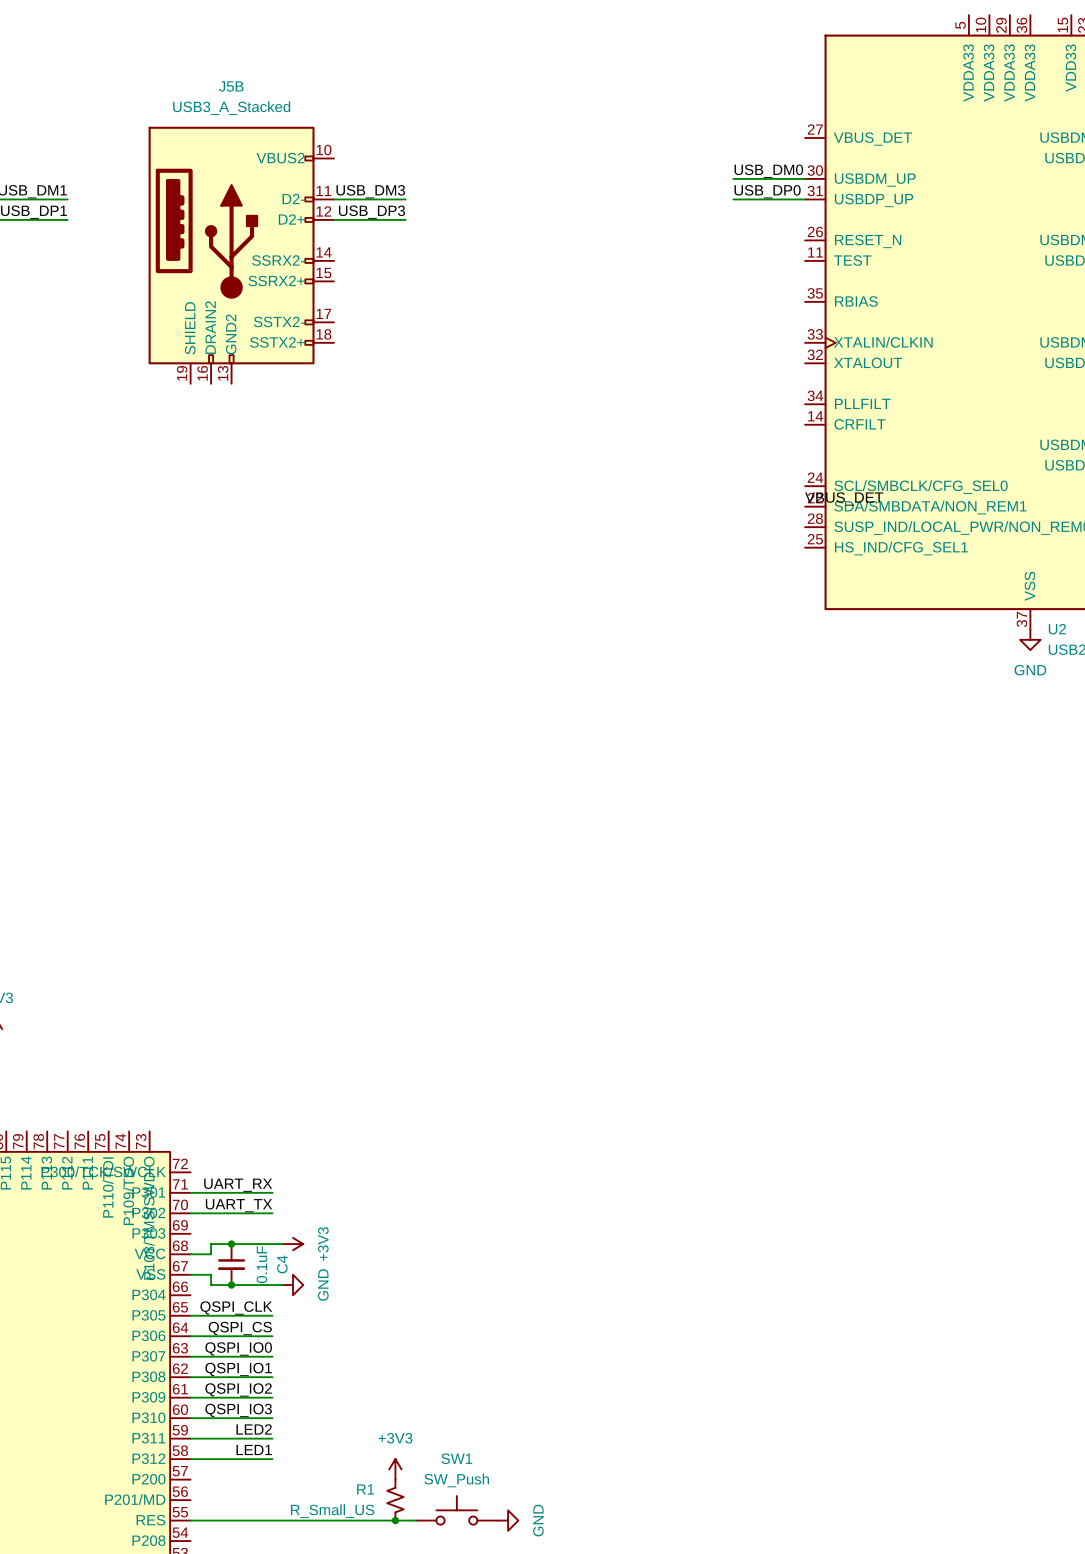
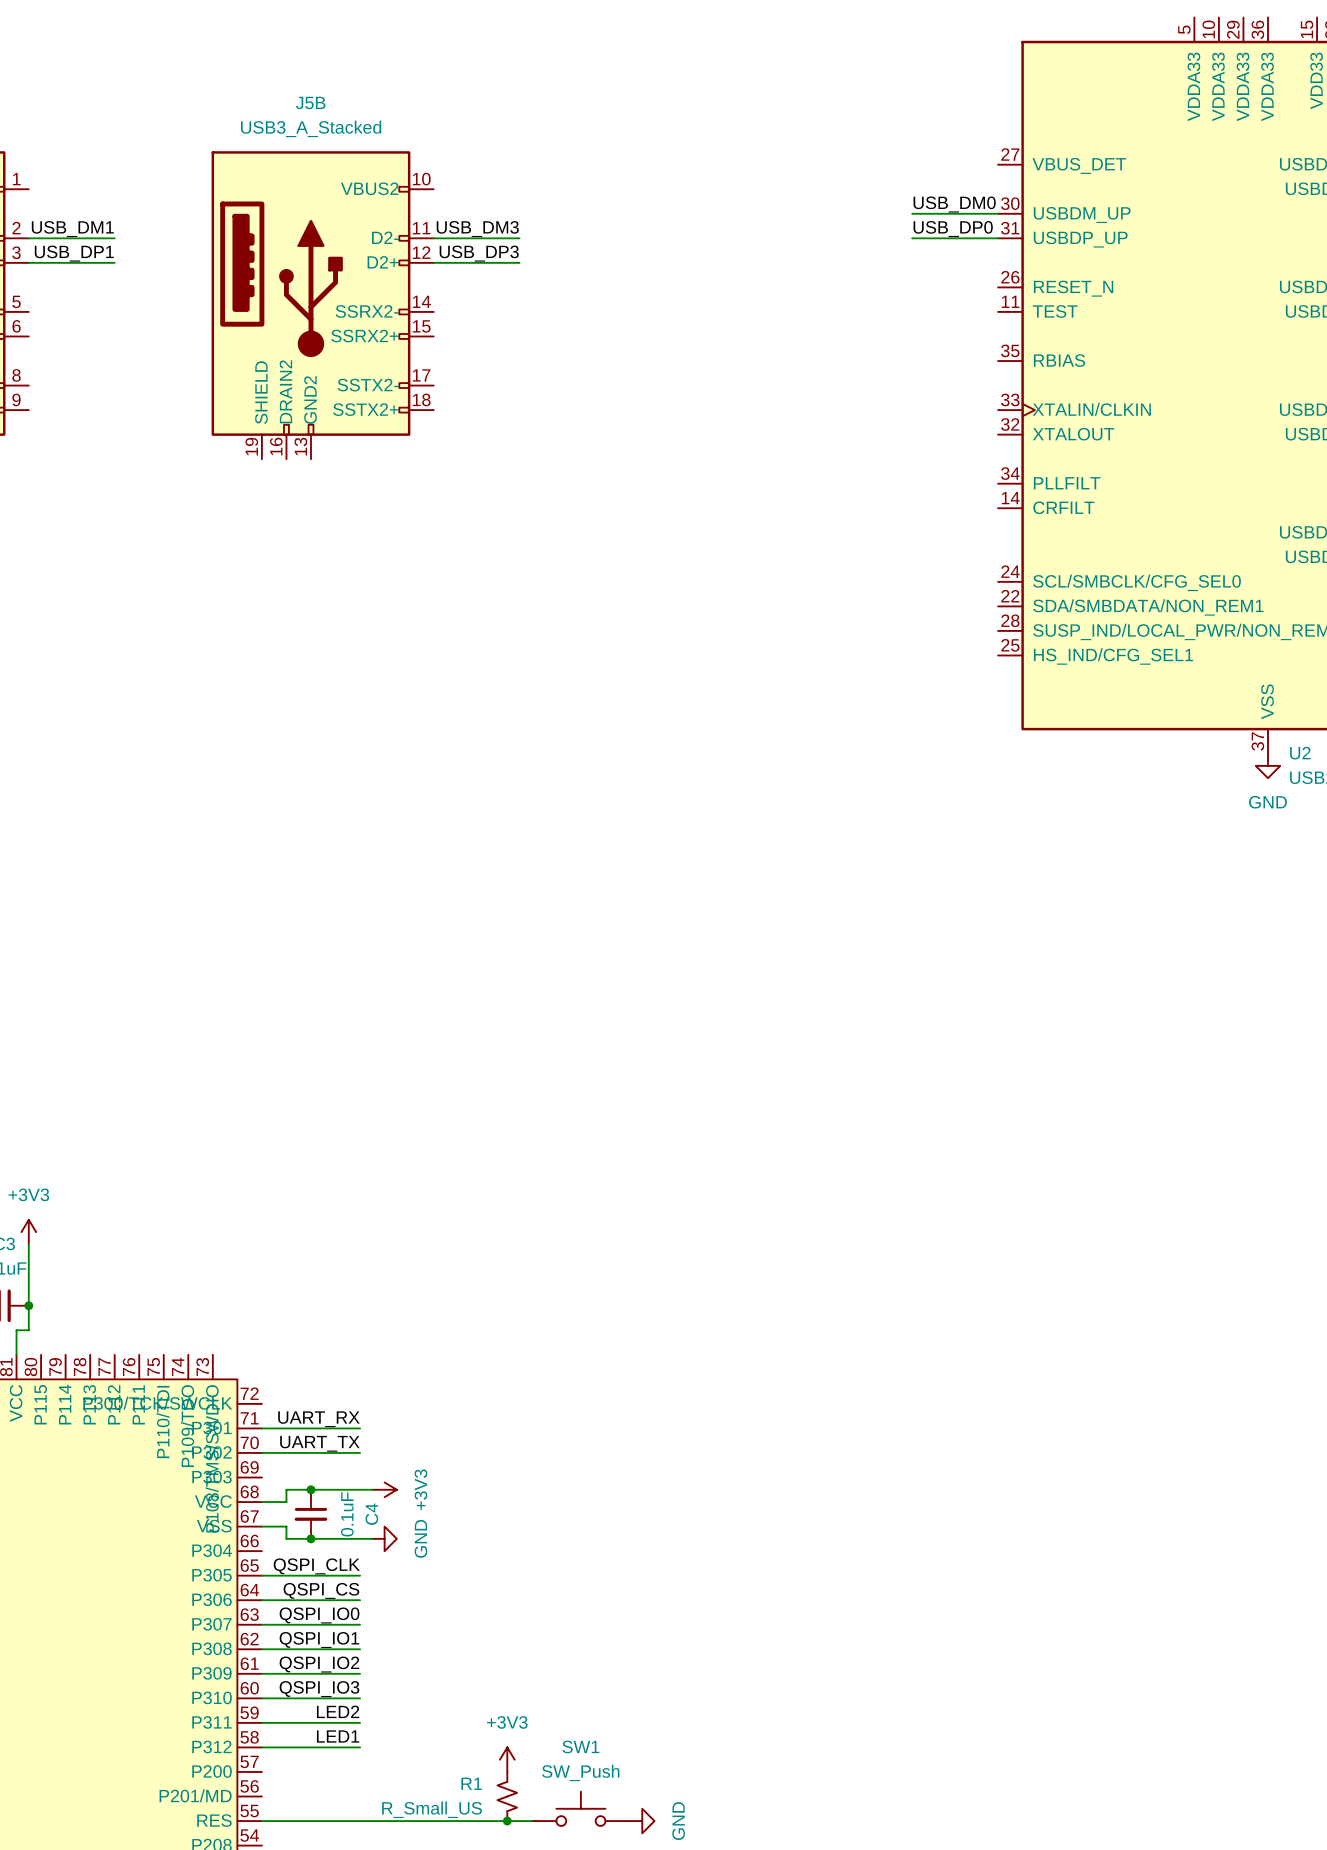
label: VBUS_DET (844, 498) -> none

